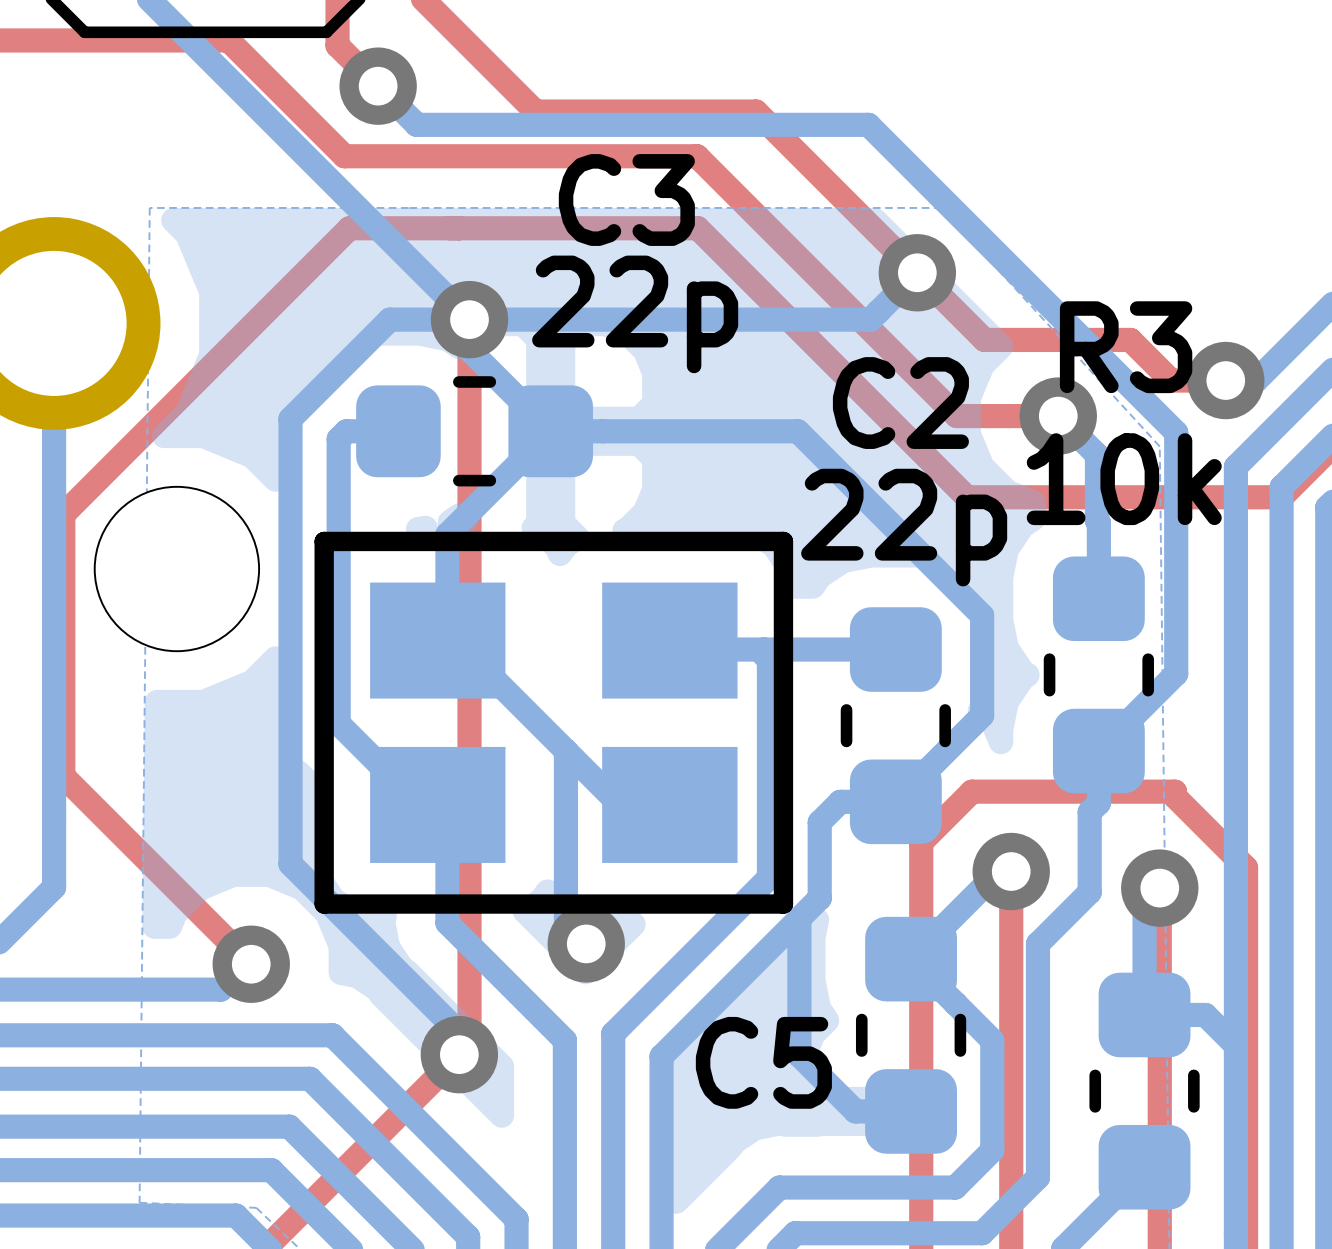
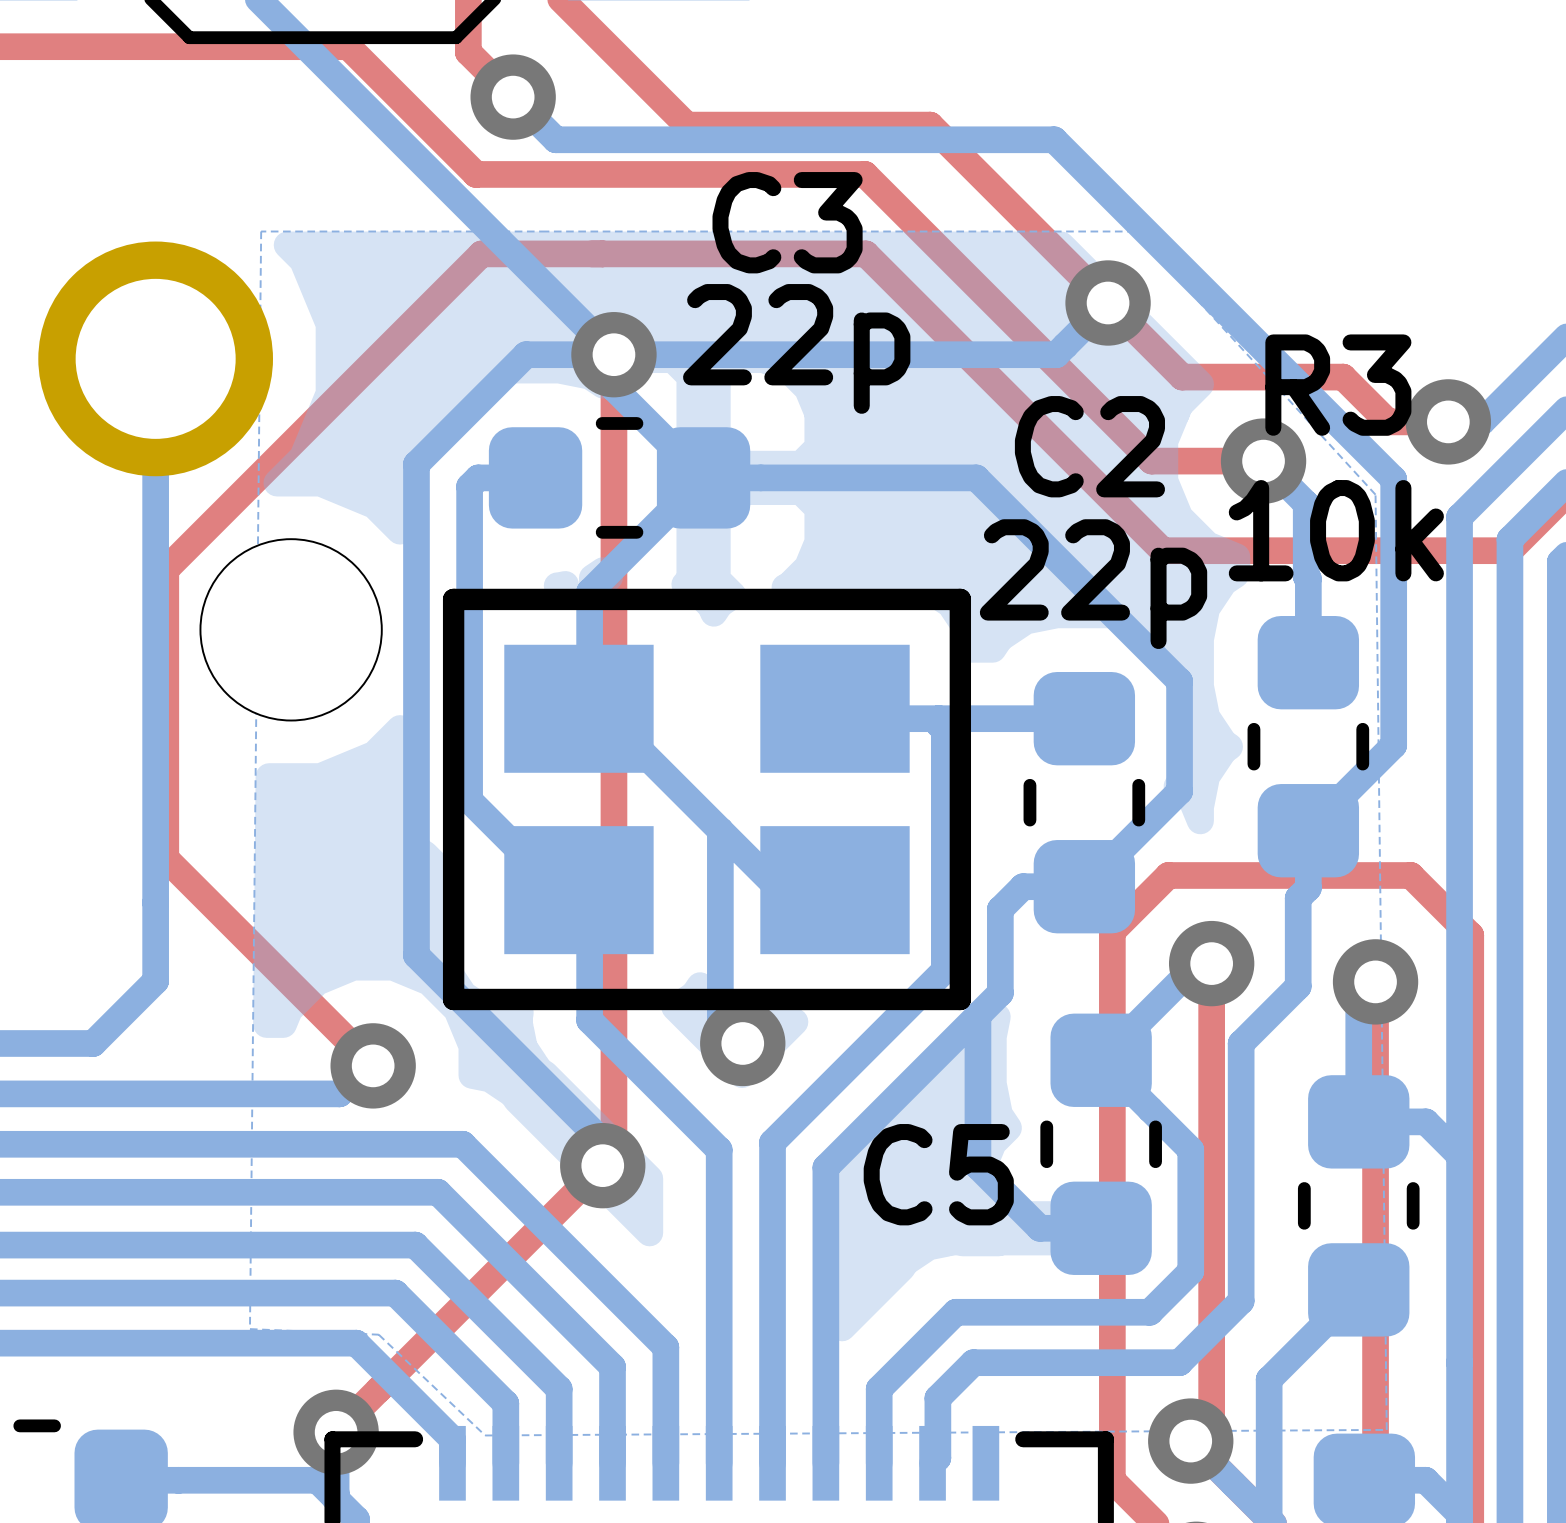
top track: (1175, 791) (1175, 796) (1246, 867) -> (1392, 875) (1410, 875) (1470, 935) (1470, 959)

